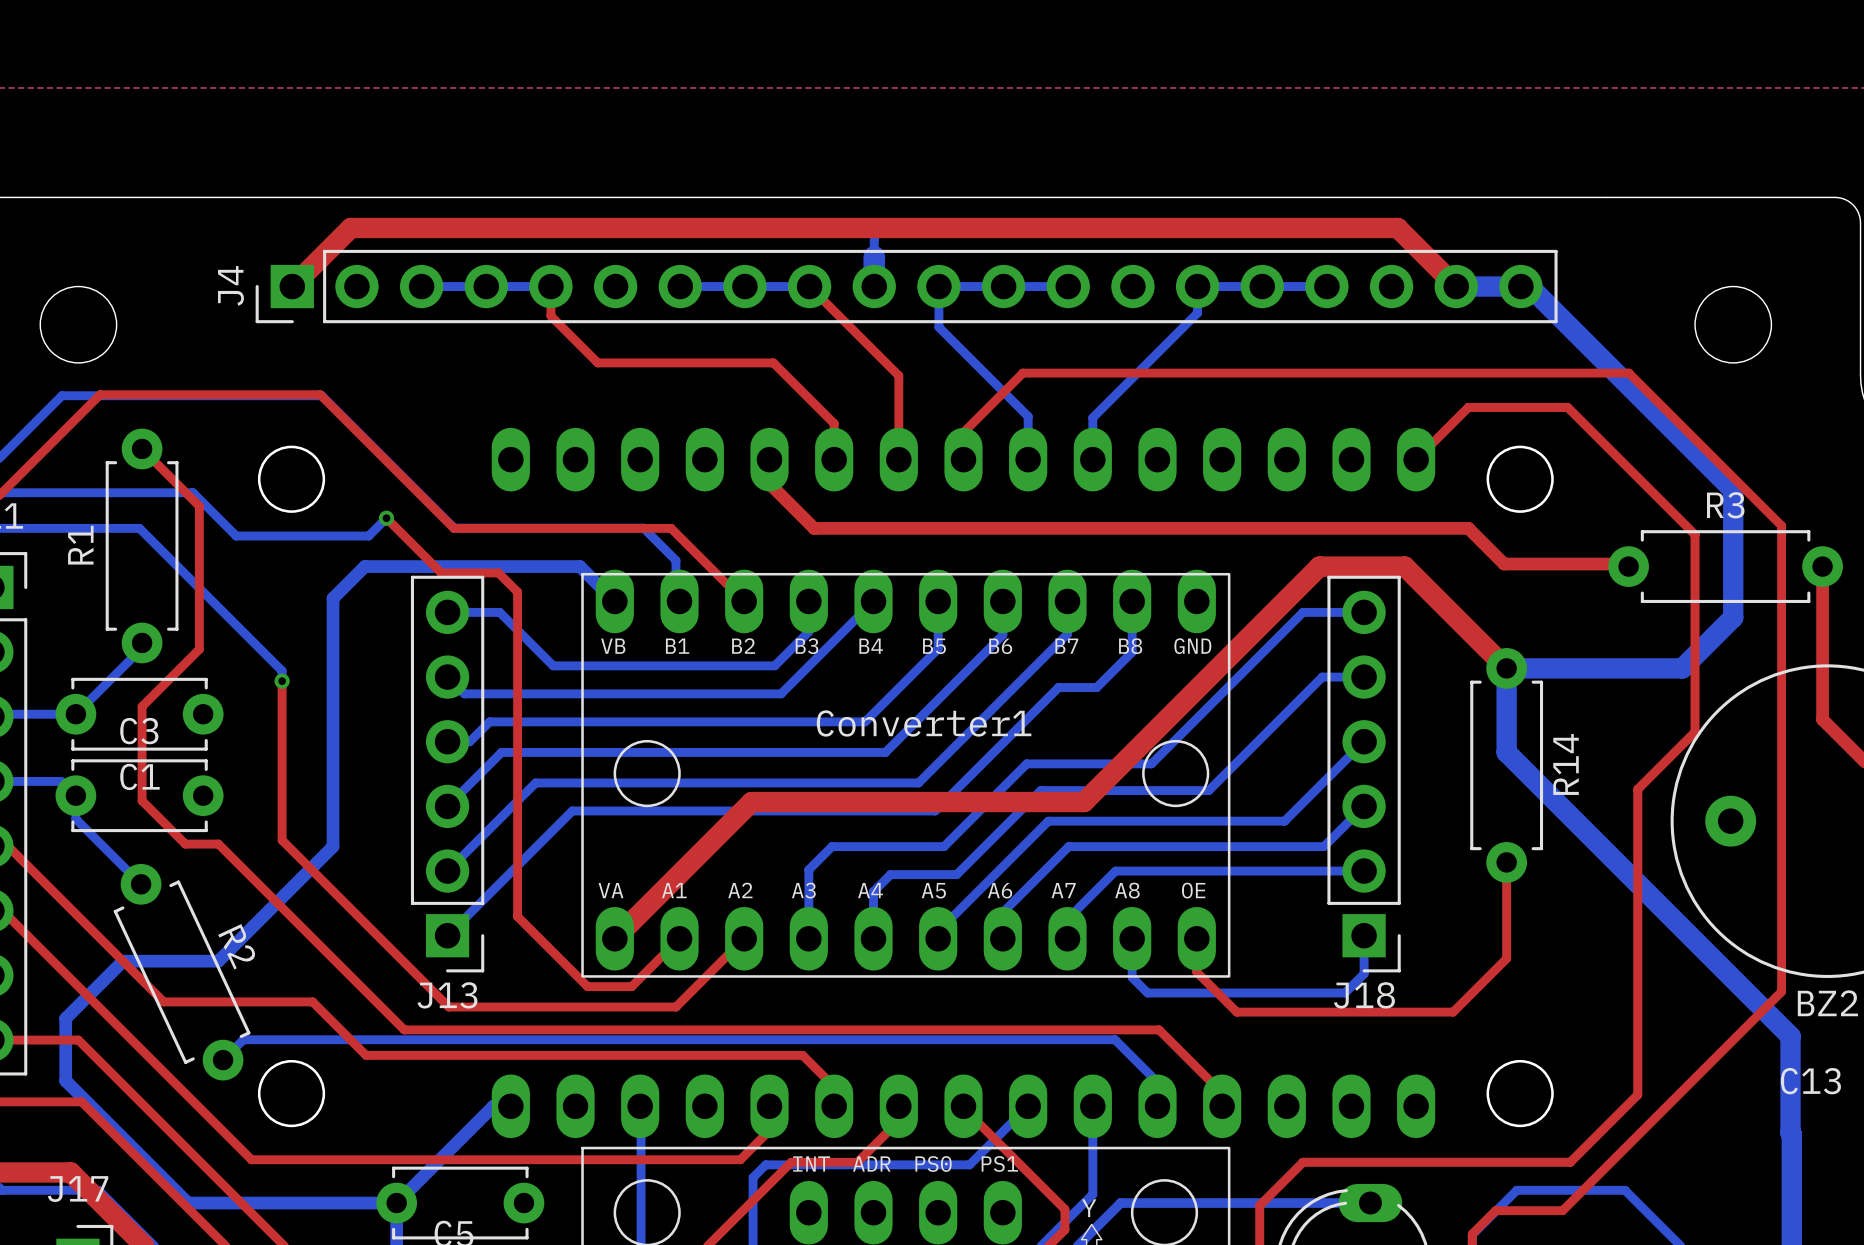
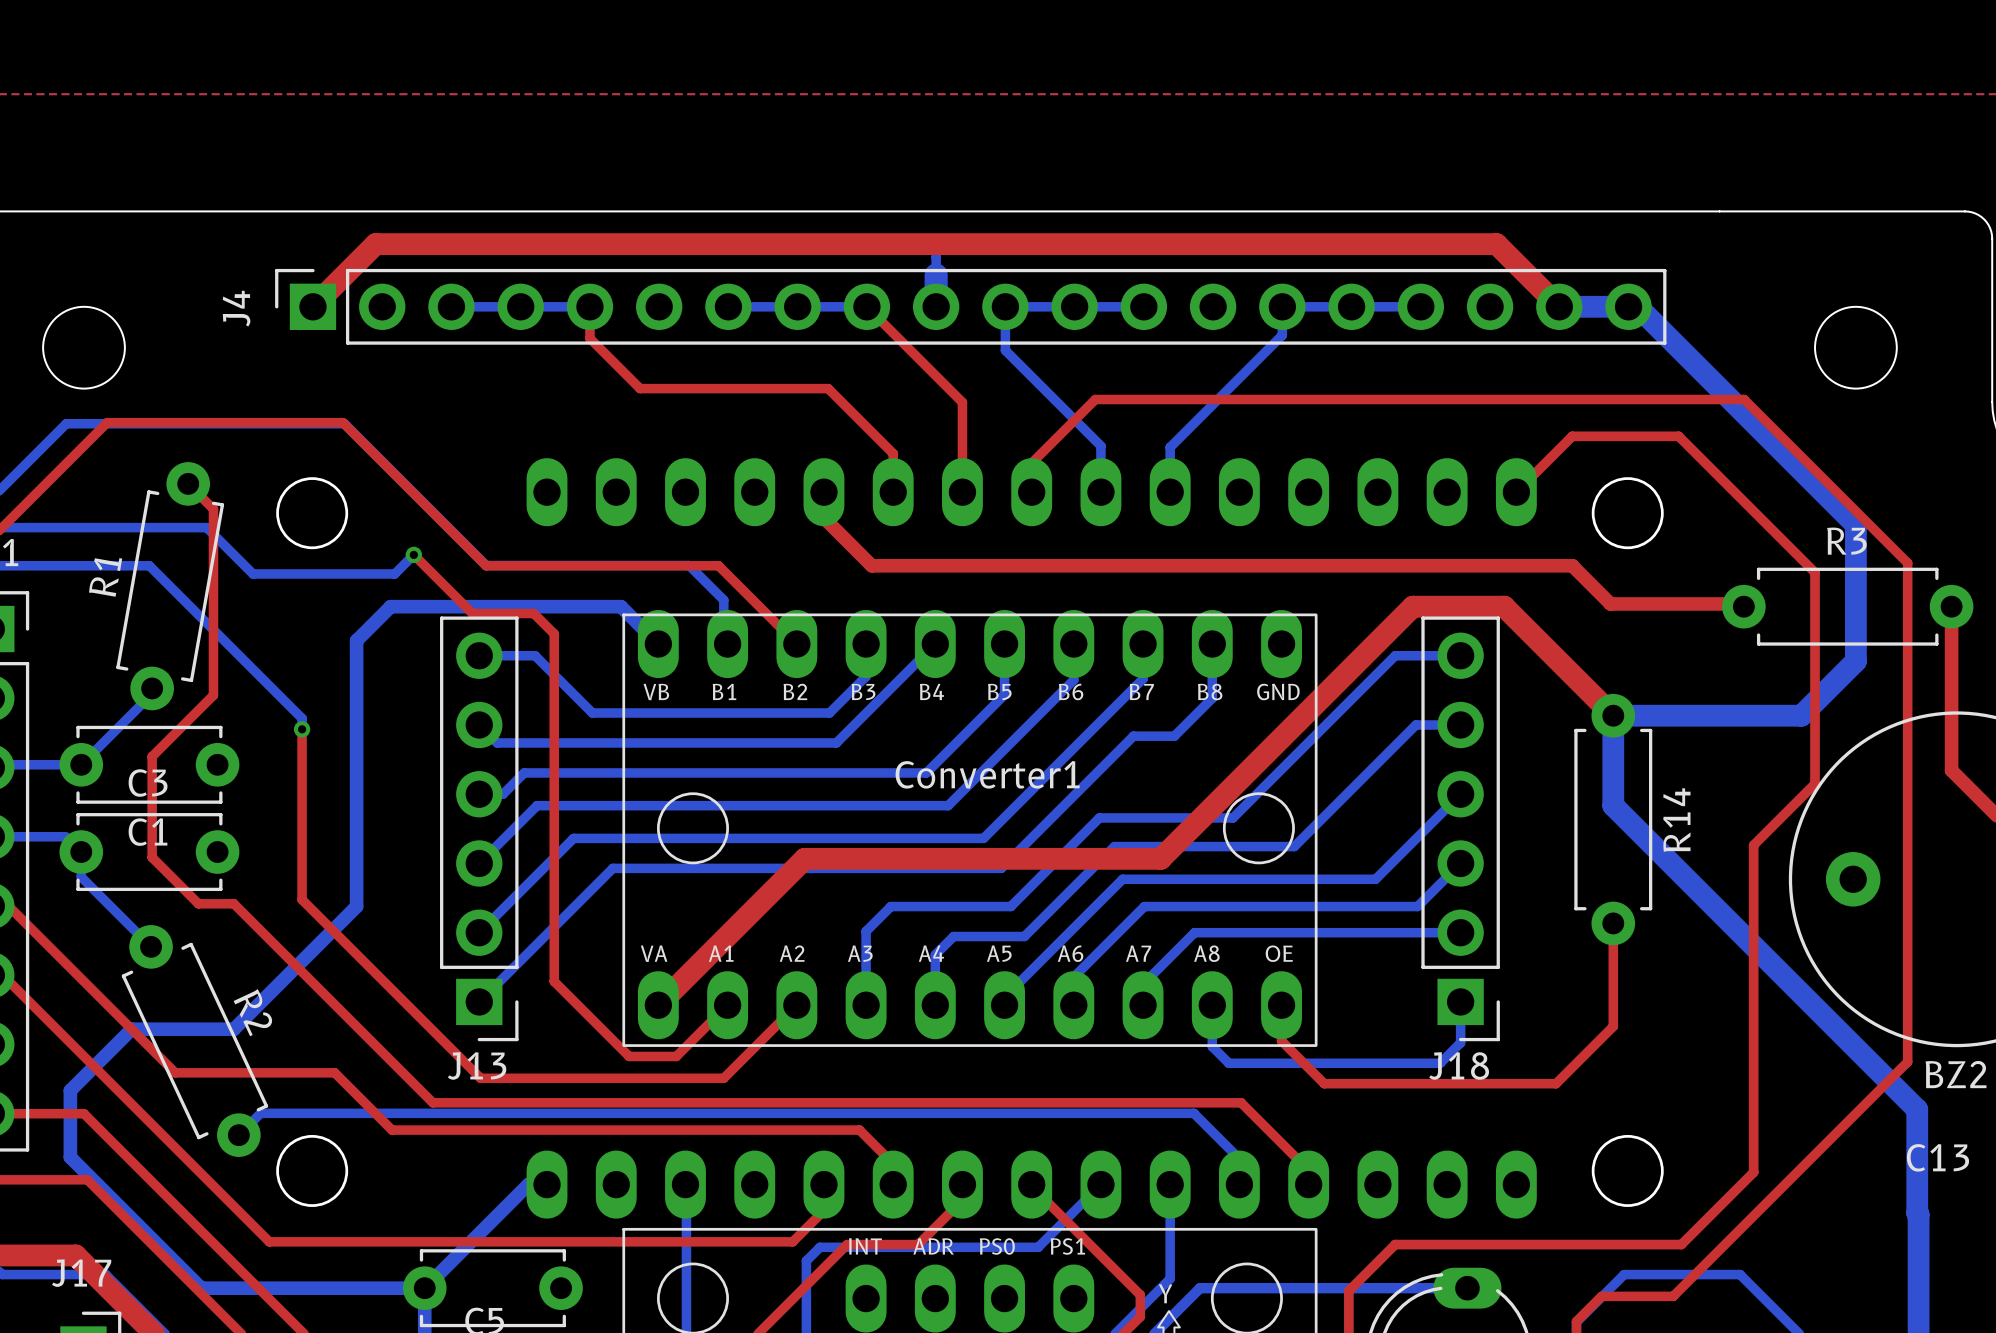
J4 footprint: [255, 249, 1558, 324] -> [275, 268, 1667, 345]
top track: (142, 448) (199, 506) -> (188, 483) (213, 509) (213, 542)
R1 rotation: 0° (142, 545) -> 10° clockwise (170, 586)

